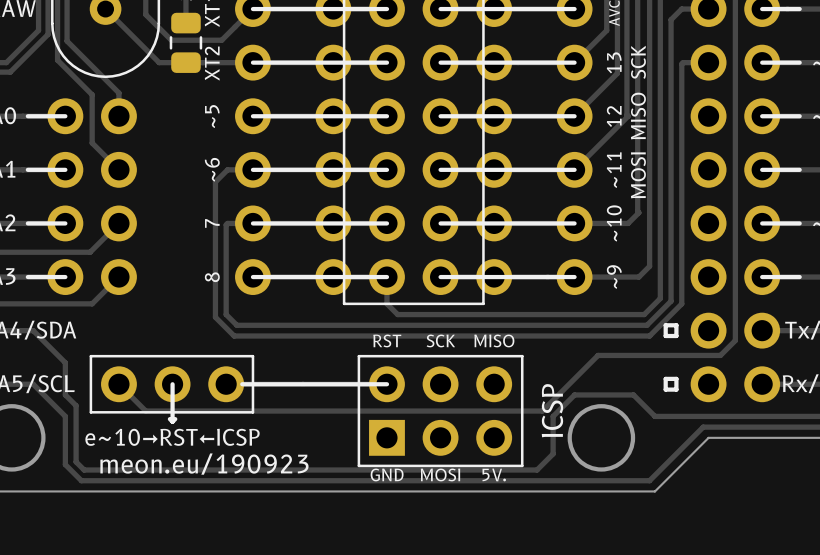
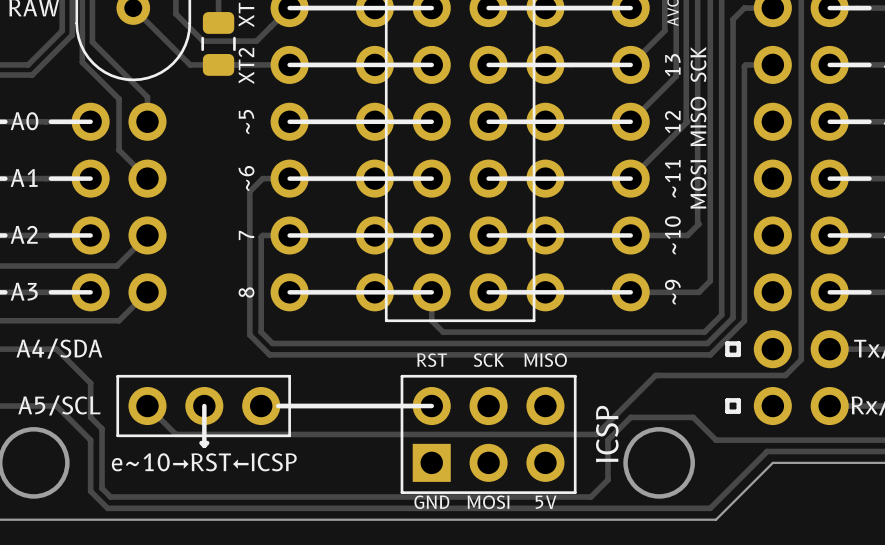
text: meon.eu/190923 (204, 464) -> none
text: 5V. (494, 474) -> 5V (546, 502)

